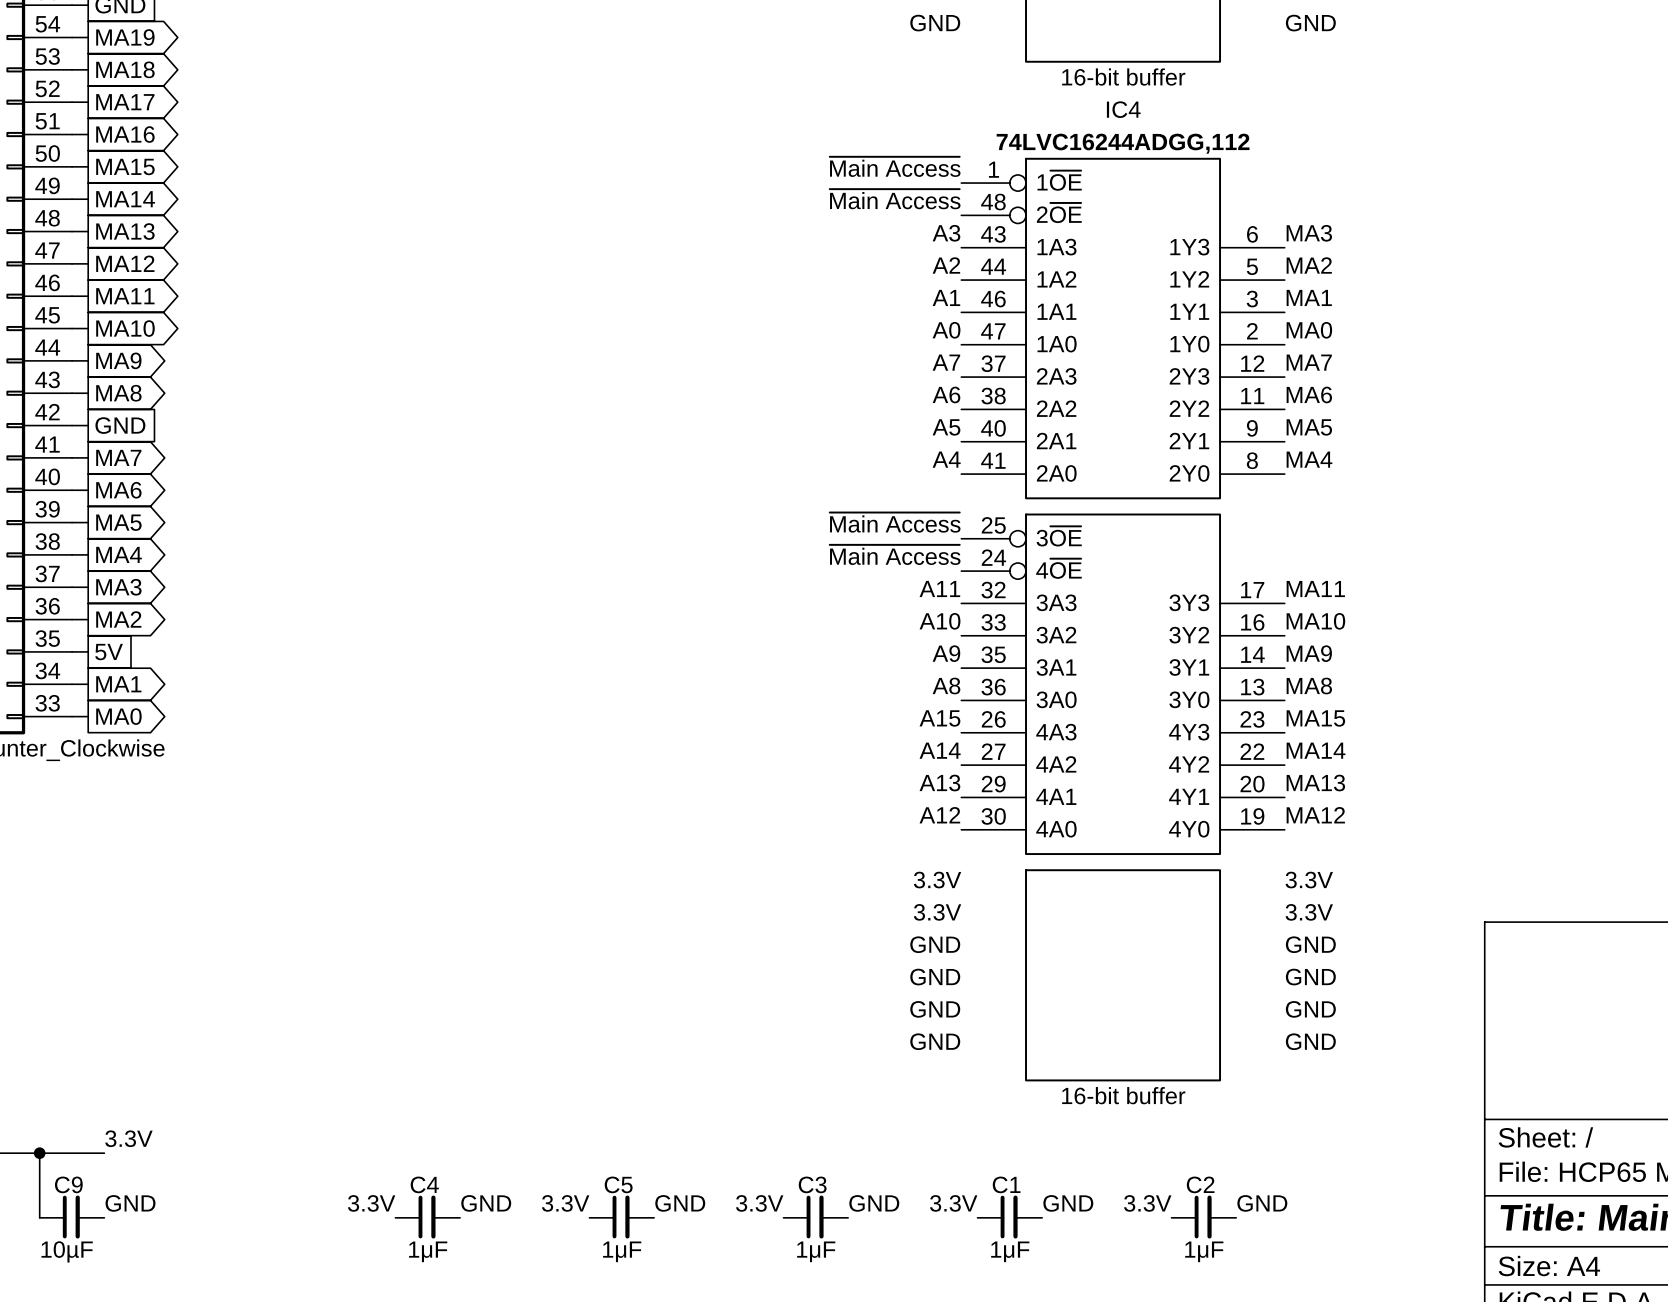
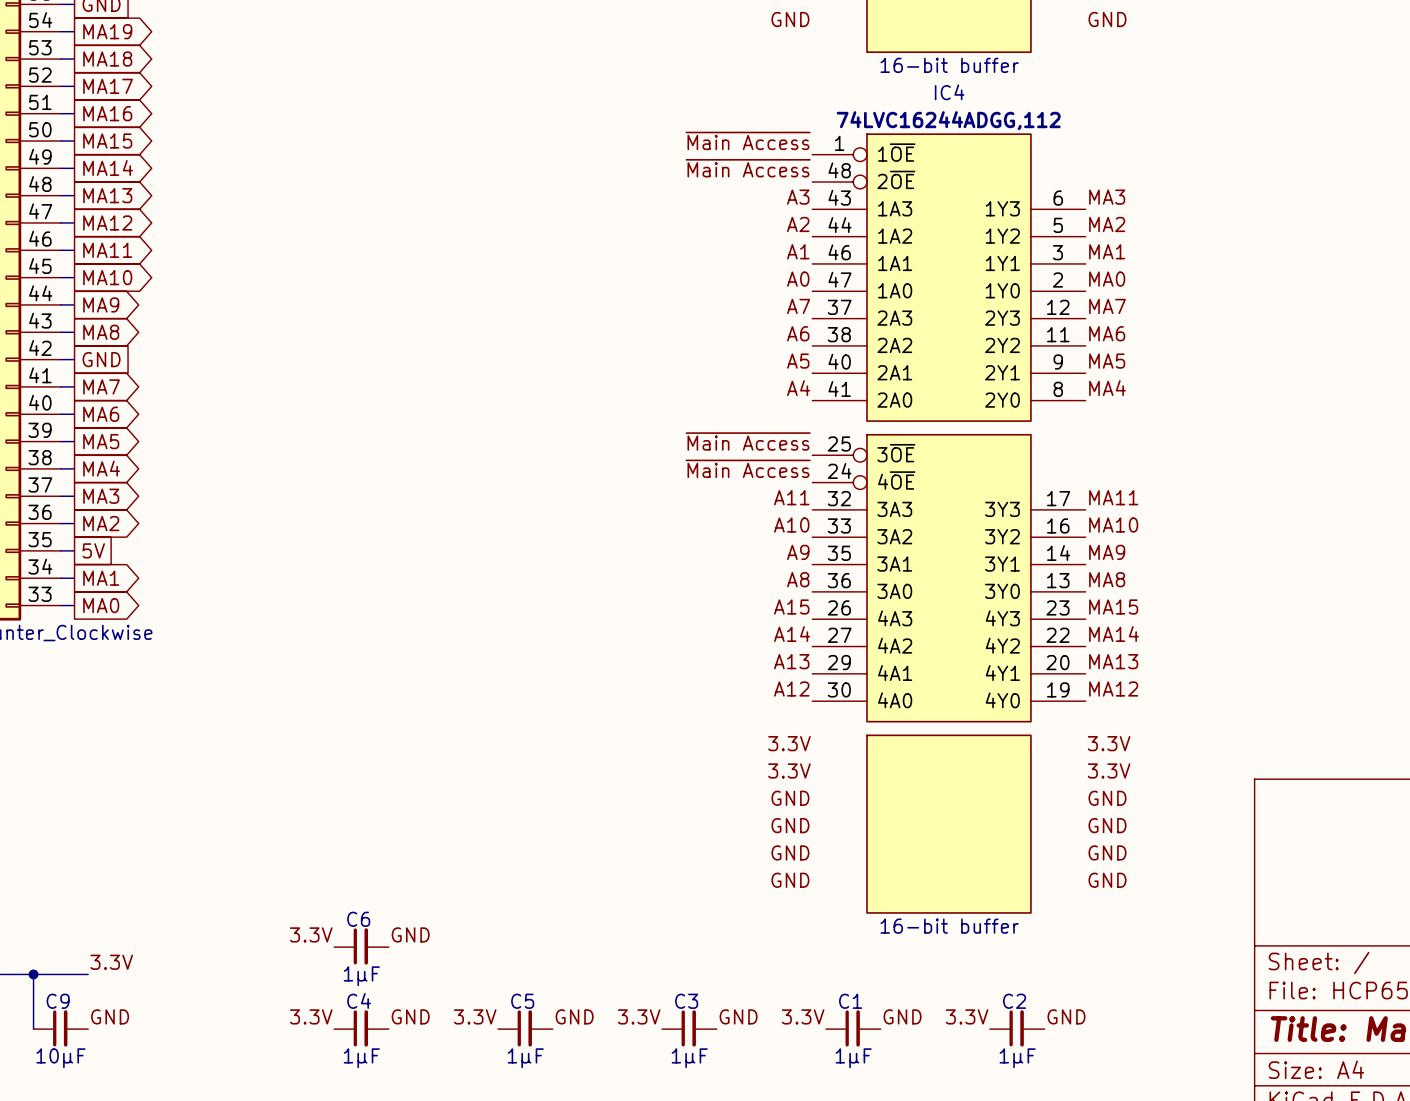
label: none -> 3.3V (311, 934)
label: none -> GND (410, 934)
C6: none -> 1μF (361, 946)

